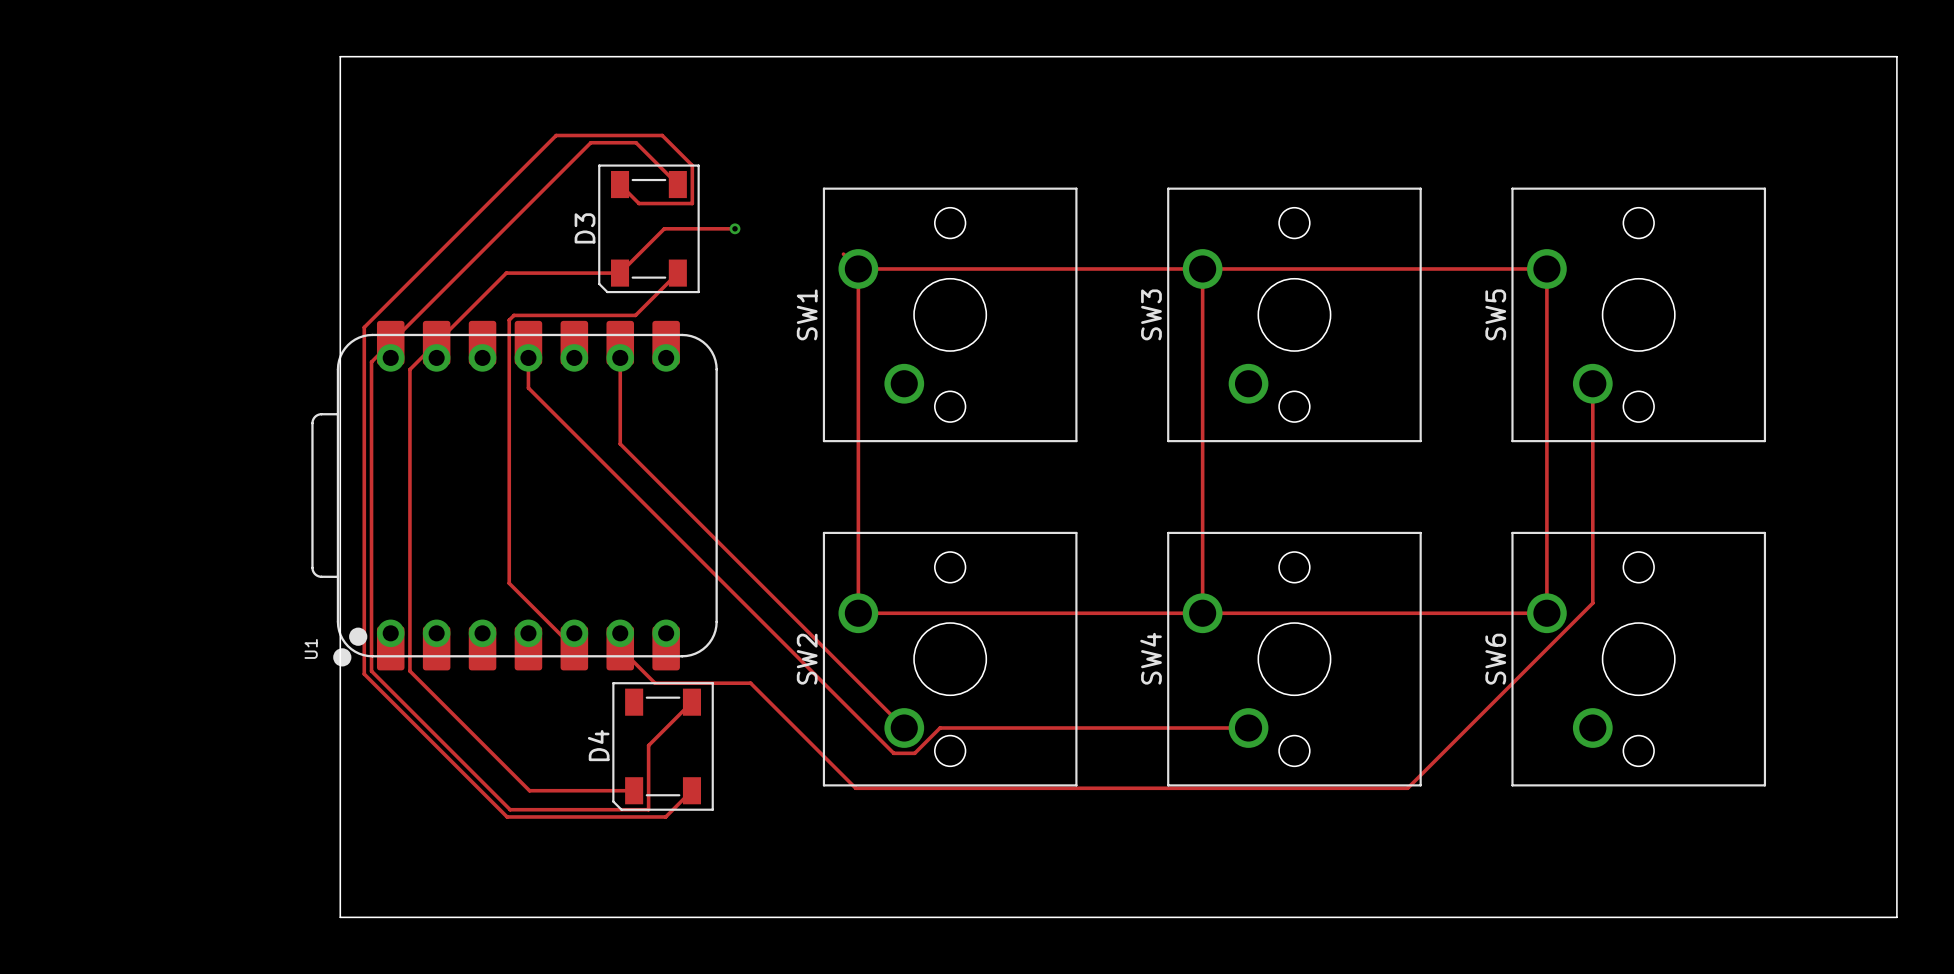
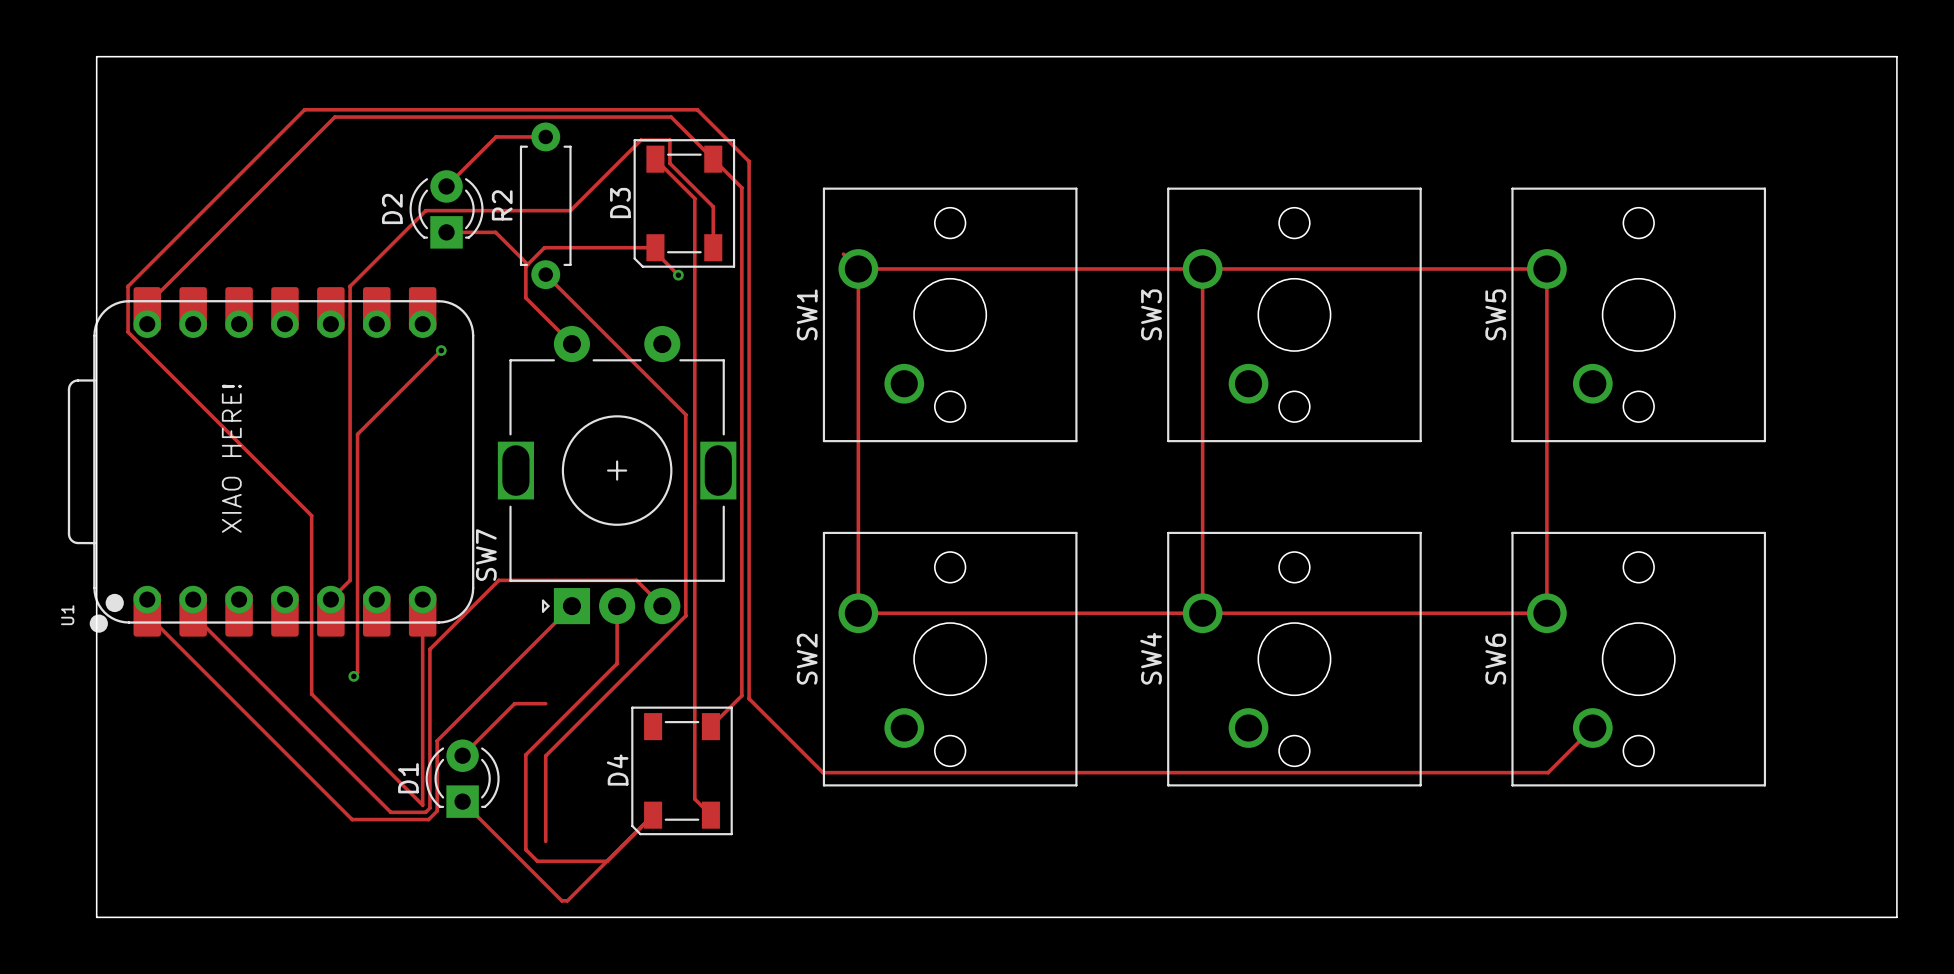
board edge: (340, 56) (340, 917) -> (340, 56) (96, 56) (96, 917) (340, 917)
track: none -> (545, 136) (496, 136) (446, 186)
track: none -> (655, 159) (694, 198) (694, 799) (710, 815)
track: (620, 184) (639, 203) (692, 203) (692, 165) (662, 135) (556, 135) (364, 327) (364, 674) (507, 816) (665, 816) (691, 790) (691, 788) -> none
track: (677, 184) (636, 142) (590, 142) (371, 362) (371, 671) (510, 809) (648, 809) (648, 745) (691, 702) -> none
R2: none -> (545, 205)
D2: none -> (446, 209)
D3 position: (648, 228) -> (684, 203)
track: (735, 228) (664, 228) (620, 273) (506, 273) (409, 369) (409, 671) (529, 790) (634, 790) -> none
via position: (735, 228) -> (678, 275)
track: none -> (446, 232) (495, 232) (527, 264)
track: none -> (713, 247) (713, 206) (669, 163) (669, 140) (640, 140) (570, 210) (425, 210) (350, 286) (350, 580) (330, 599)
track: (677, 273) (635, 315) (513, 315) (509, 320) (509, 583) (574, 648) -> none
track: none -> (545, 274) (685, 414) (685, 615) (545, 755) (545, 841)
track: none -> (678, 275) (655, 252) (655, 247) (544, 247) (525, 266) (525, 297) (571, 344)
track: none -> (147, 324) (147, 304) (334, 117) (671, 117) (741, 187) (741, 695) (710, 726)
track: (620, 342) (620, 443) (904, 728) -> none
track: none -> (441, 350) (357, 434) (357, 672) (353, 676)
via: none -> (441, 350)
track: (528, 357) (528, 387) (893, 753) (914, 753) (940, 728) (1248, 728) -> none
track: (1592, 383) (1592, 603) (1407, 788) (855, 788) (750, 683) (655, 683) (620, 648) -> none
text: none -> XIAO HERE! (231, 458)
SW7: none -> (617, 475)
U1 position: (514, 495) -> (271, 461)
track: none -> (147, 599) (147, 614) (352, 819) (428, 819) (437, 811) (437, 740) (571, 606)
track: none -> (193, 599) (193, 614) (390, 812) (425, 812) (429, 808) (429, 649) (498, 580) (636, 580) (662, 606)
track: none -> (422, 599) (422, 805) (311, 694) (311, 515) (128, 332) (128, 286) (304, 109) (697, 109) (749, 161) (749, 698) (823, 772) (1548, 772) (1592, 728)
track: none -> (617, 606) (617, 663) (525, 754) (525, 849) (537, 861) (606, 861)
via: none -> (353, 676)
track: none -> (545, 703) (514, 703) (462, 755)
D4 position: (663, 746) -> (682, 770)
D1: none -> (462, 778)
track: none -> (462, 801) (561, 900) (567, 900) (653, 815)

